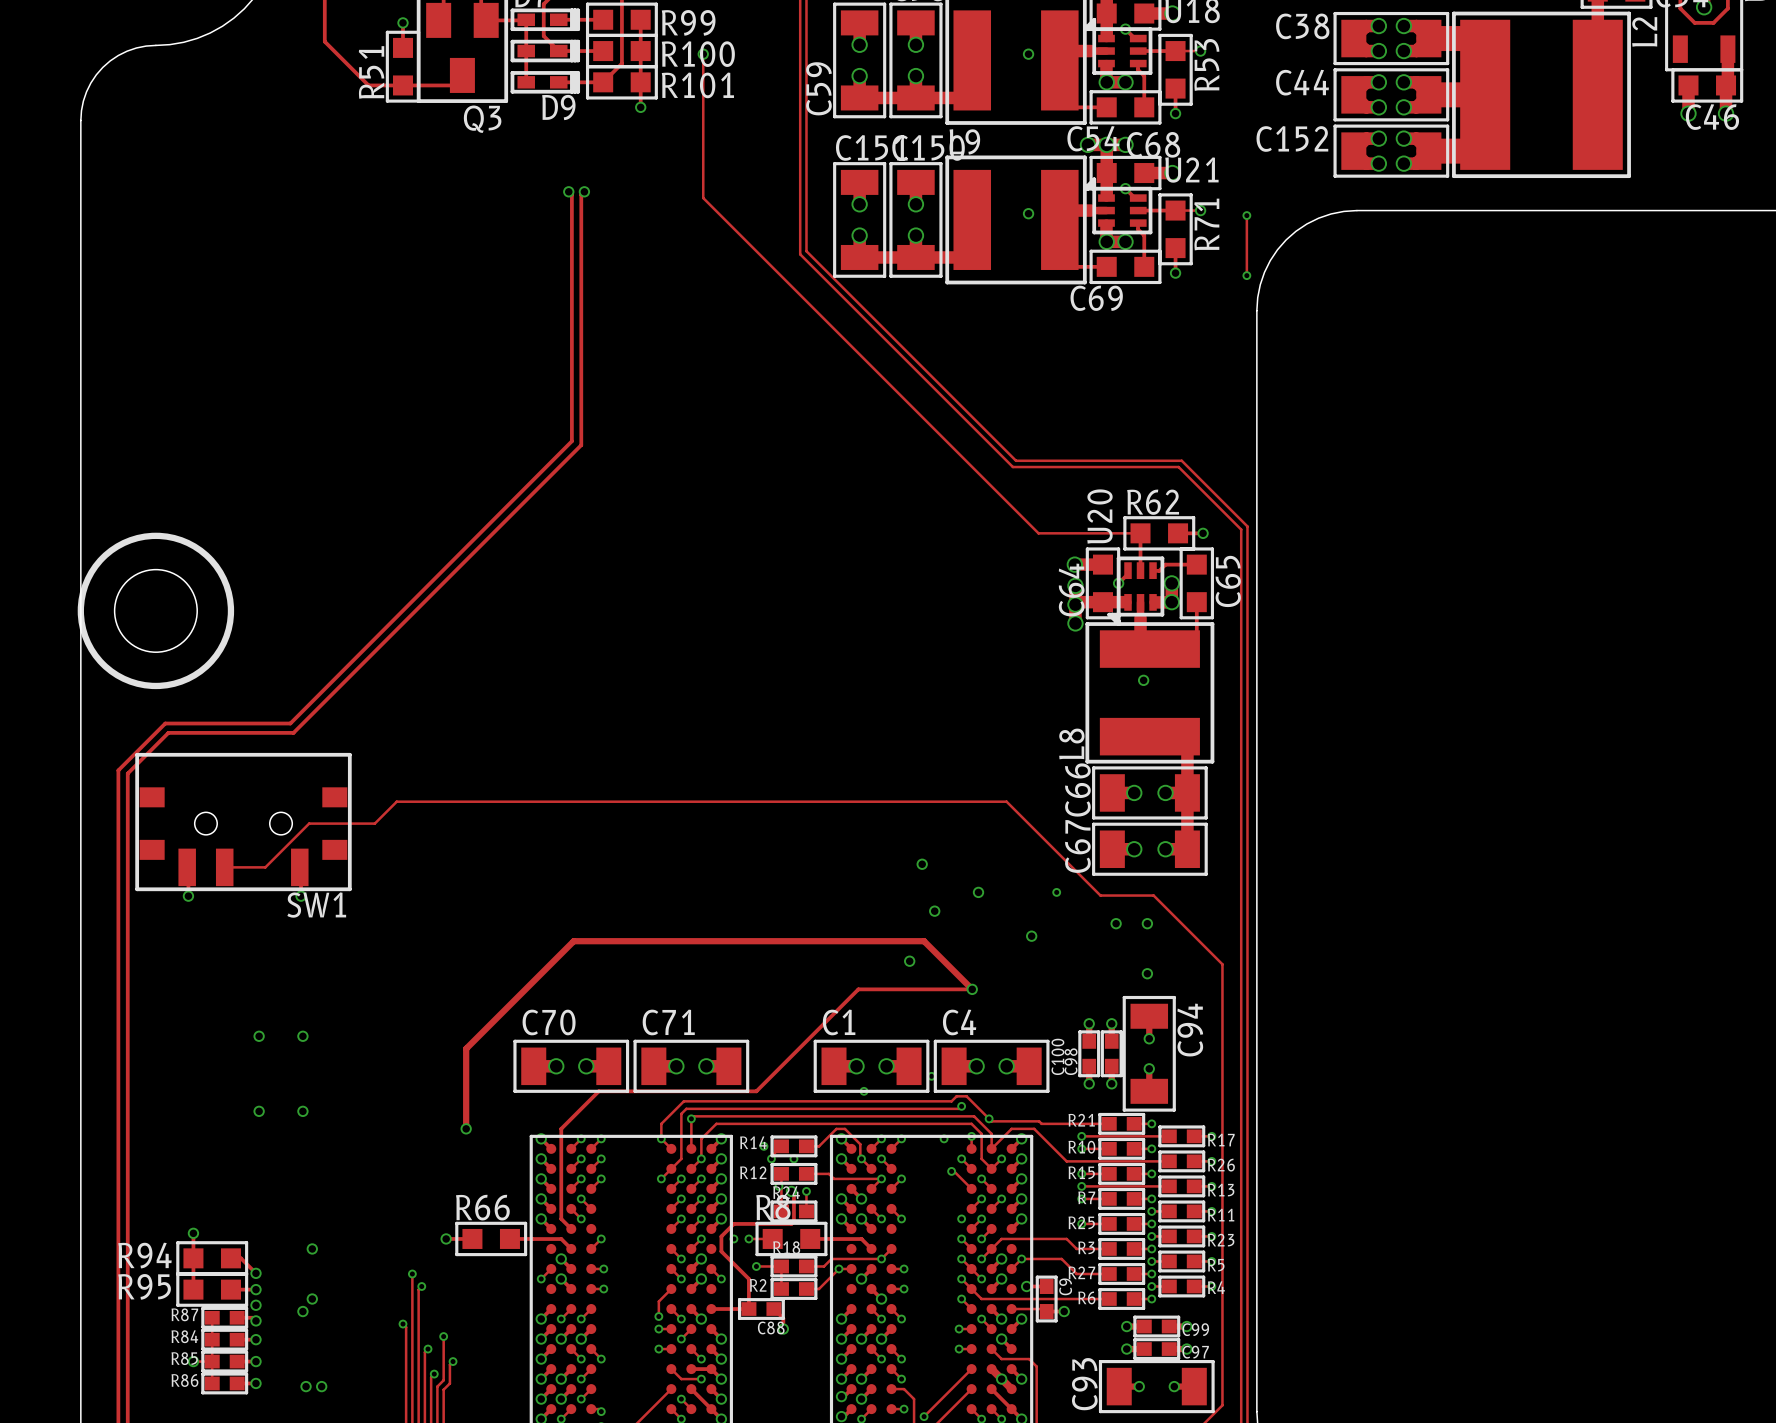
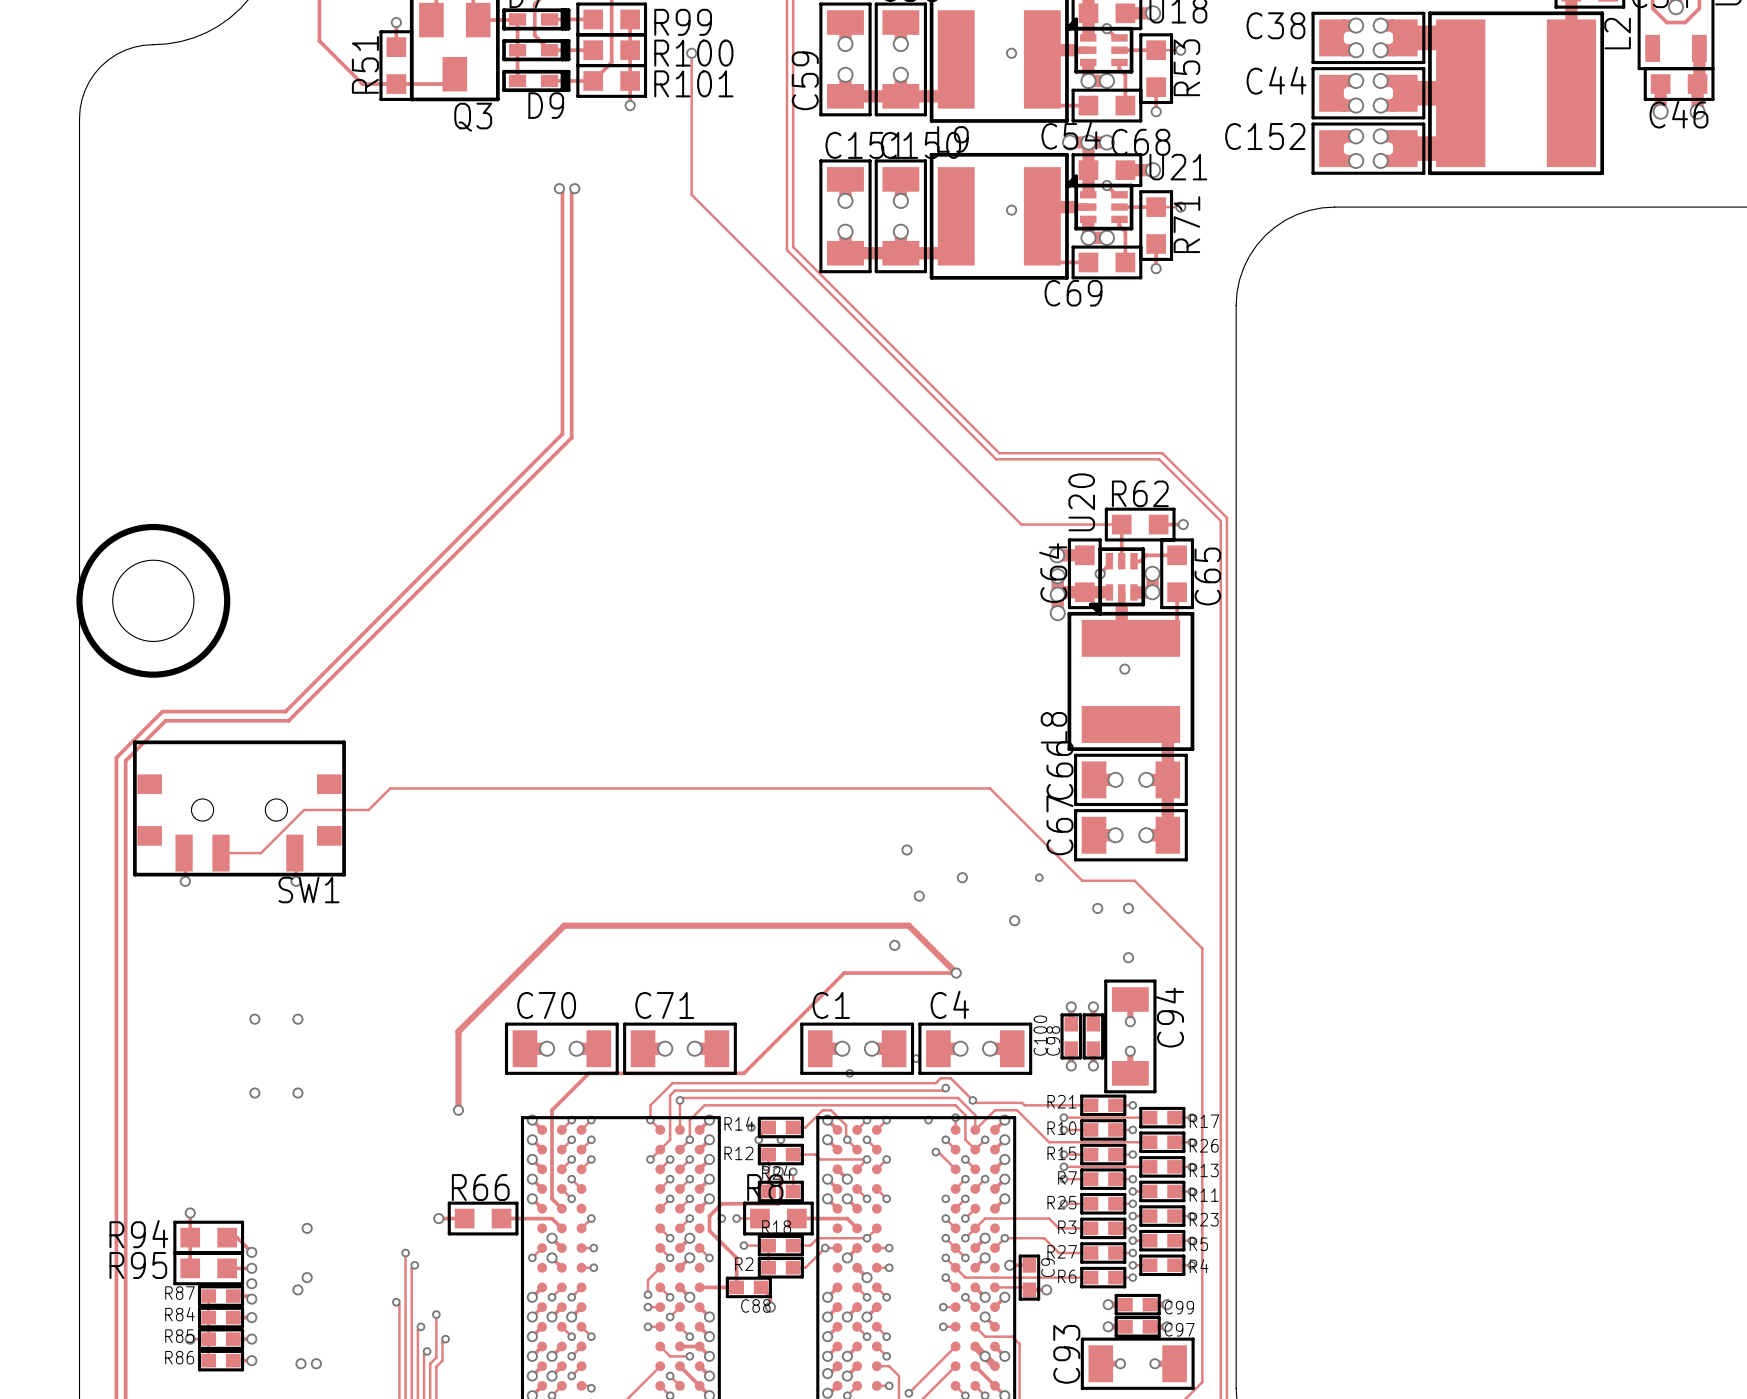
track: (1246, 215) (1246, 275) -> none
via: (1246, 215) -> none
via: (1246, 275) -> none

